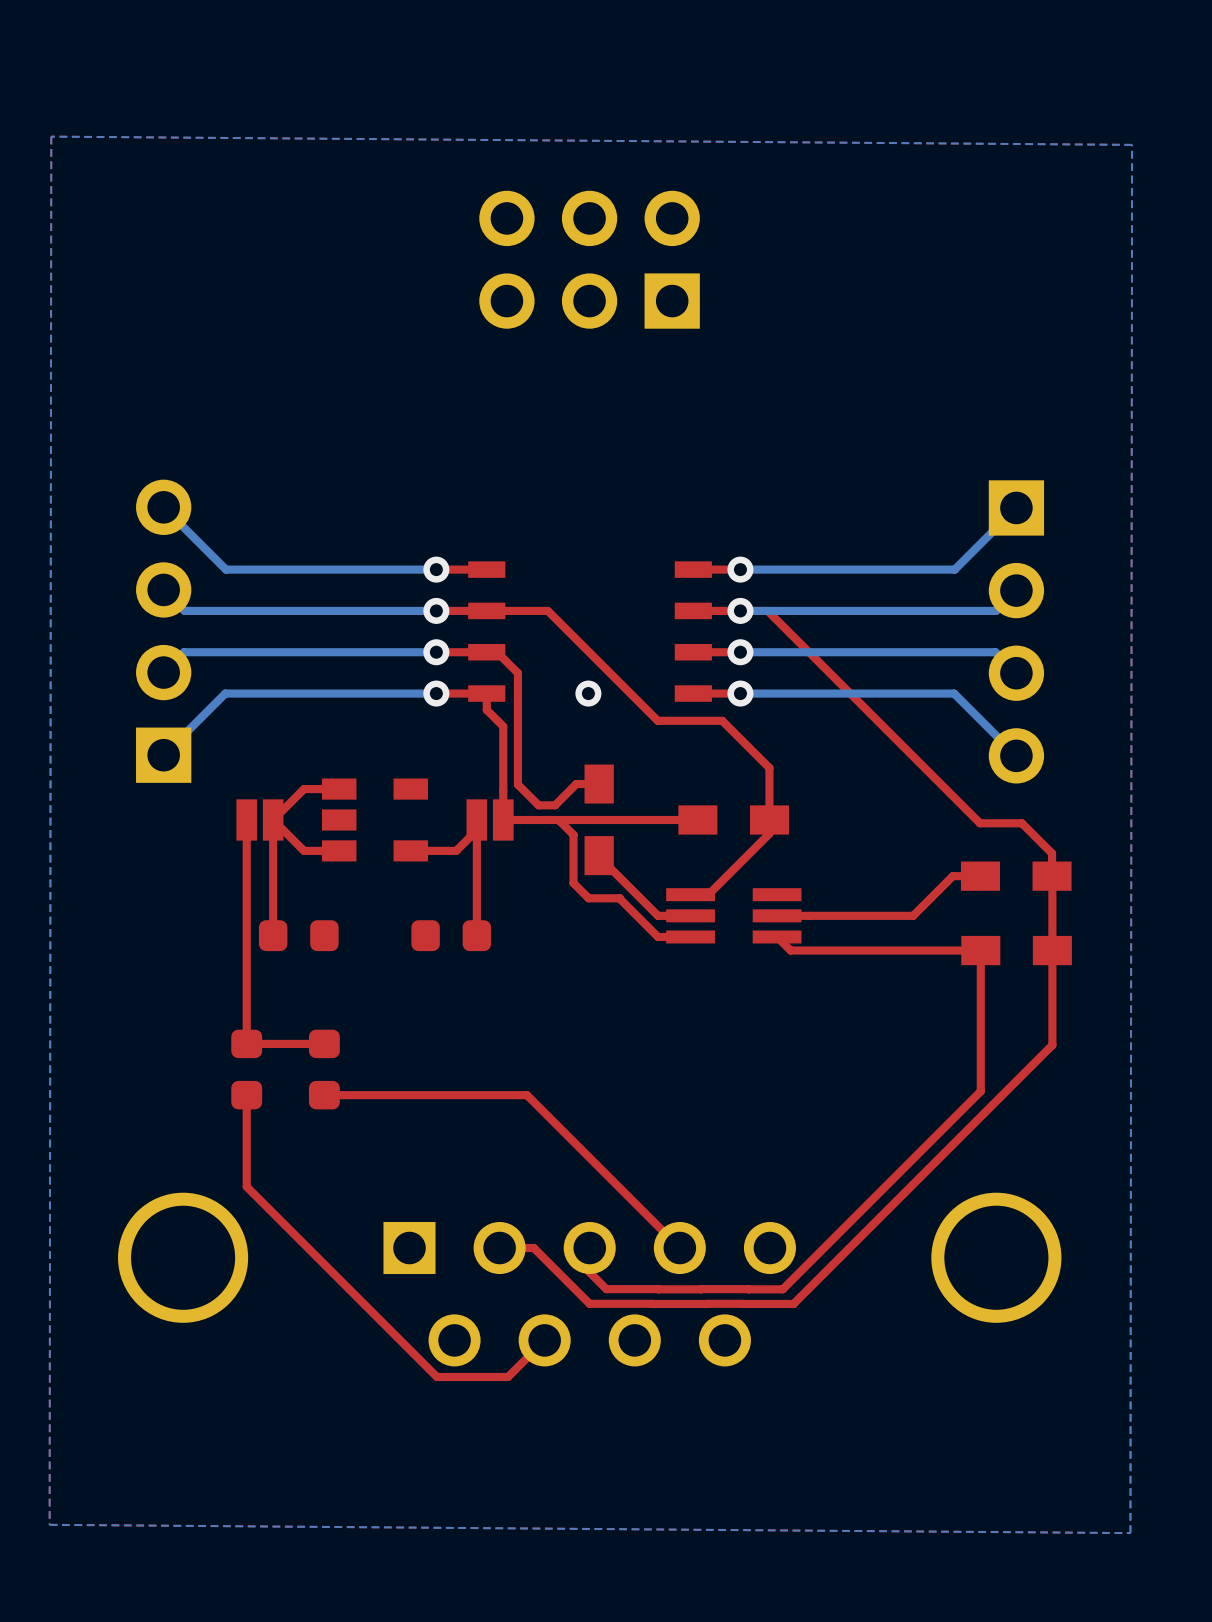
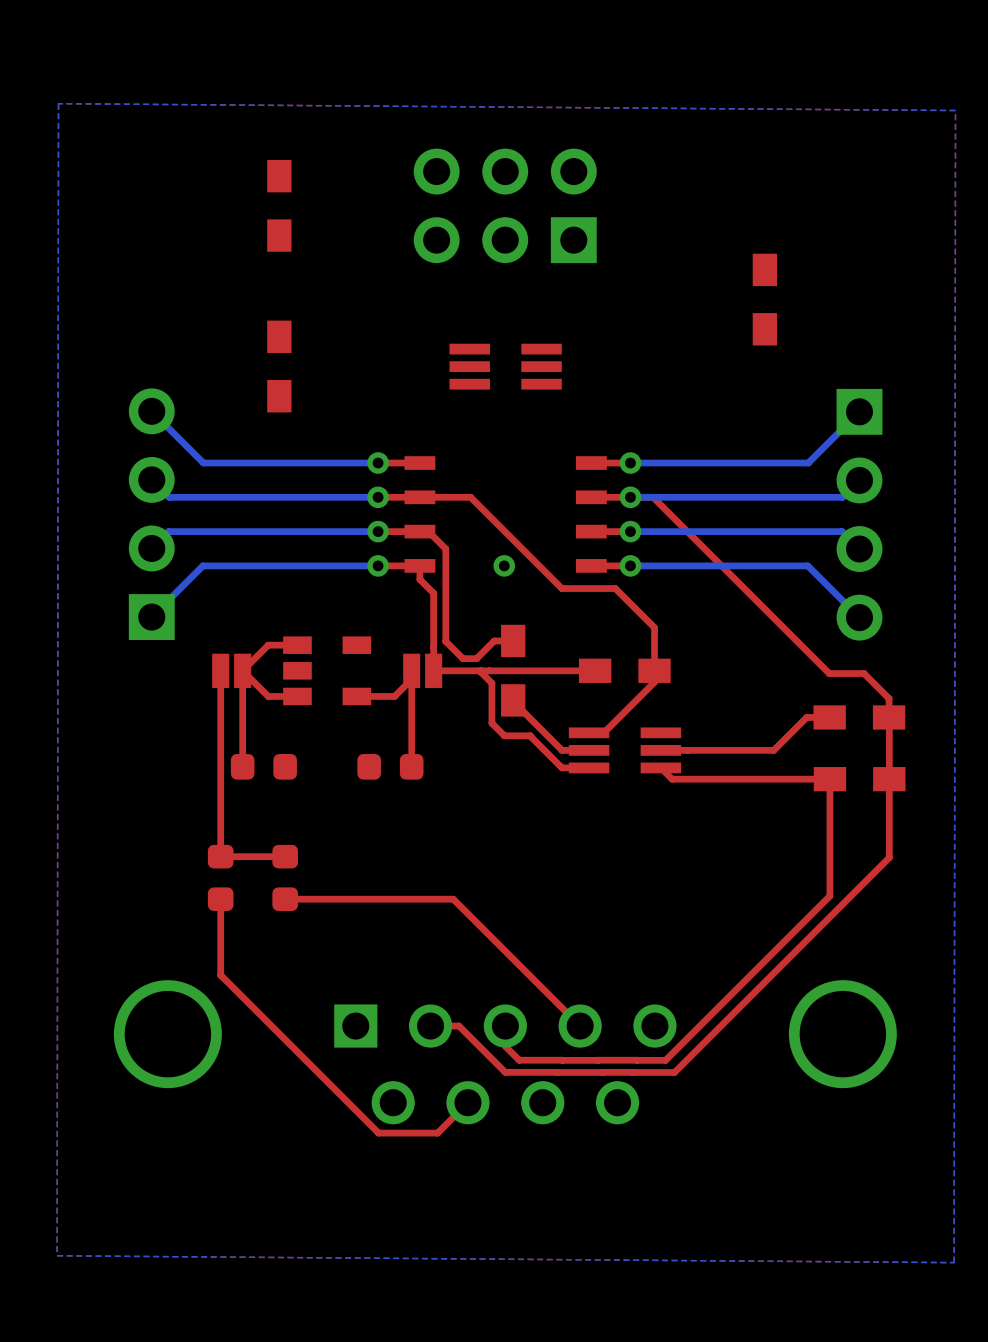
part: none -> (279, 205)
part: none -> (764, 299)
part: none -> (279, 366)
part: none -> (505, 366)

